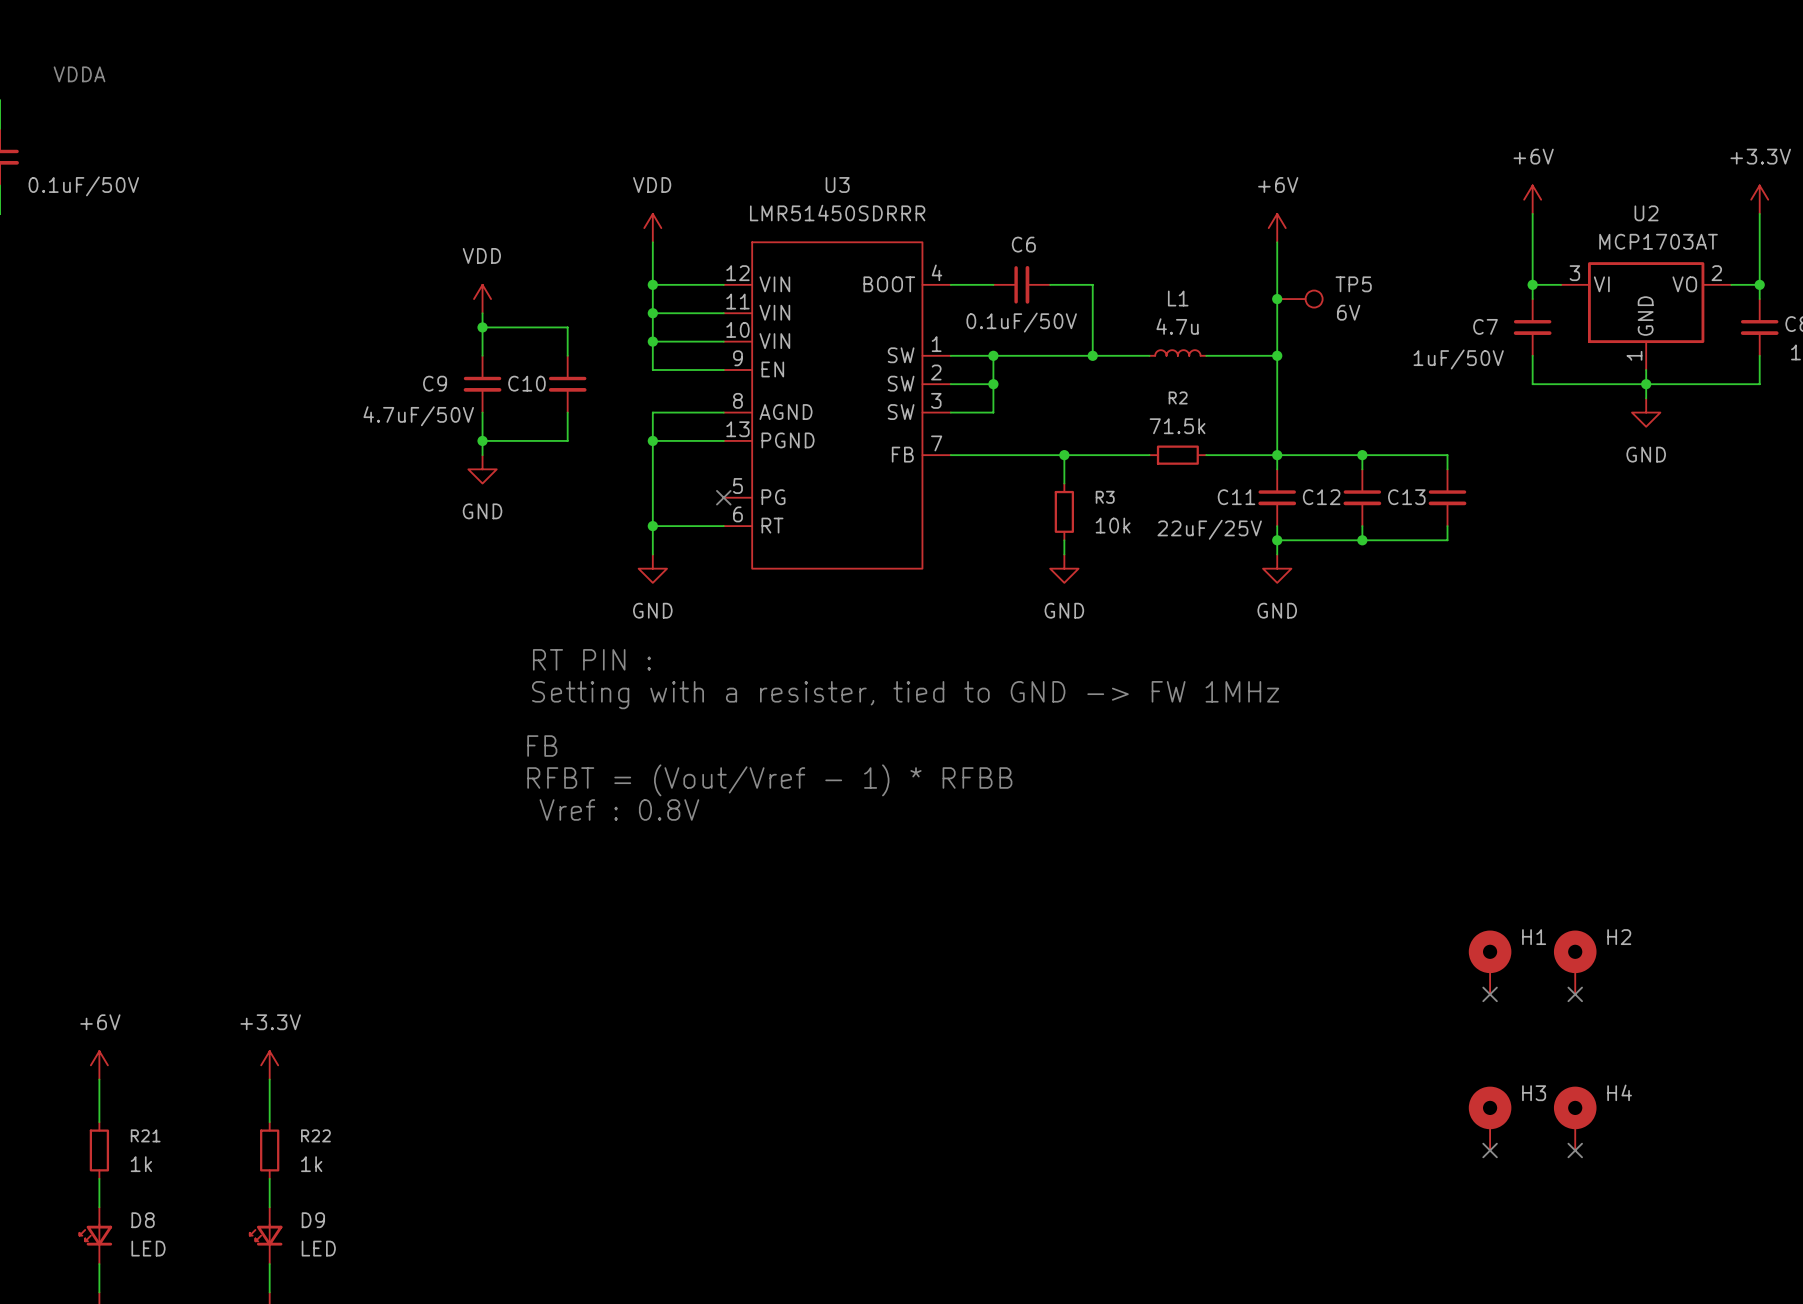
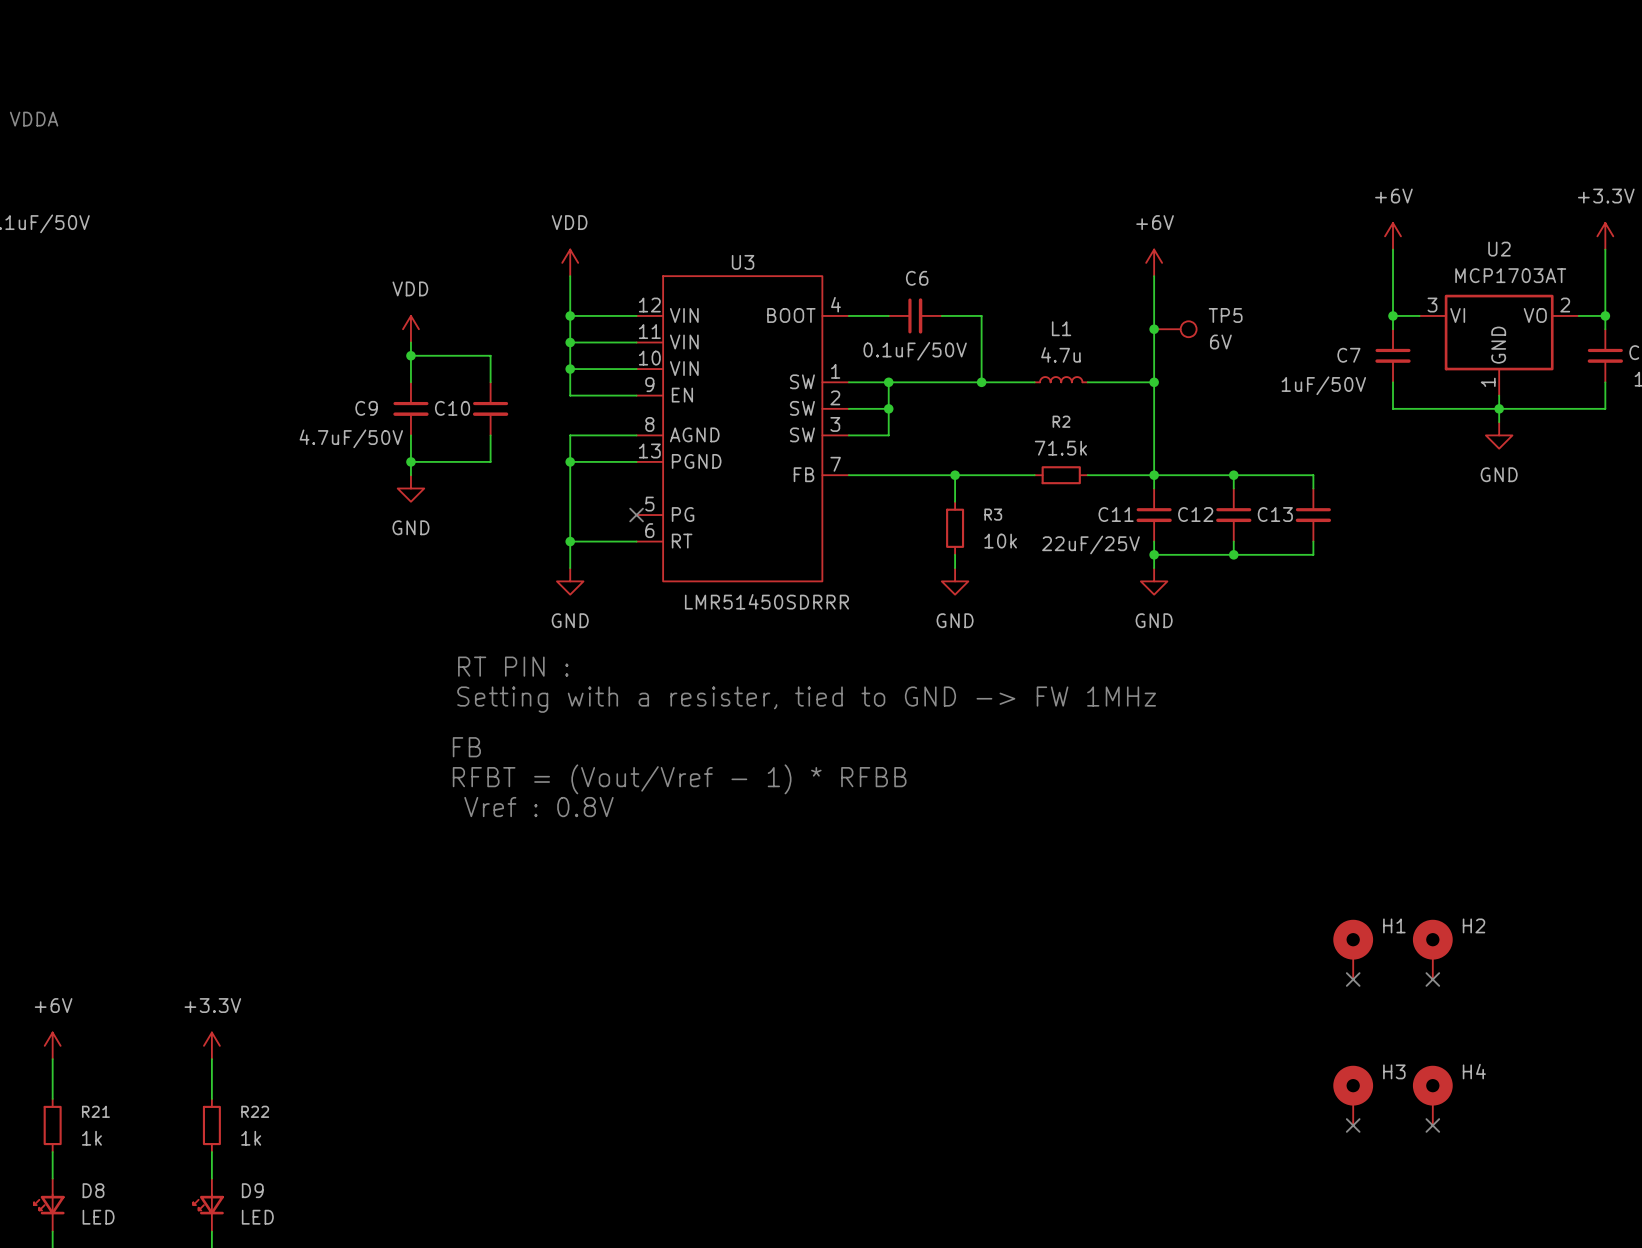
U3 name position: U3 (837, 184) -> U3 (743, 262)
U3 value position: LMR51450SDRRR (837, 213) -> LMR51450SDRRR (766, 601)

